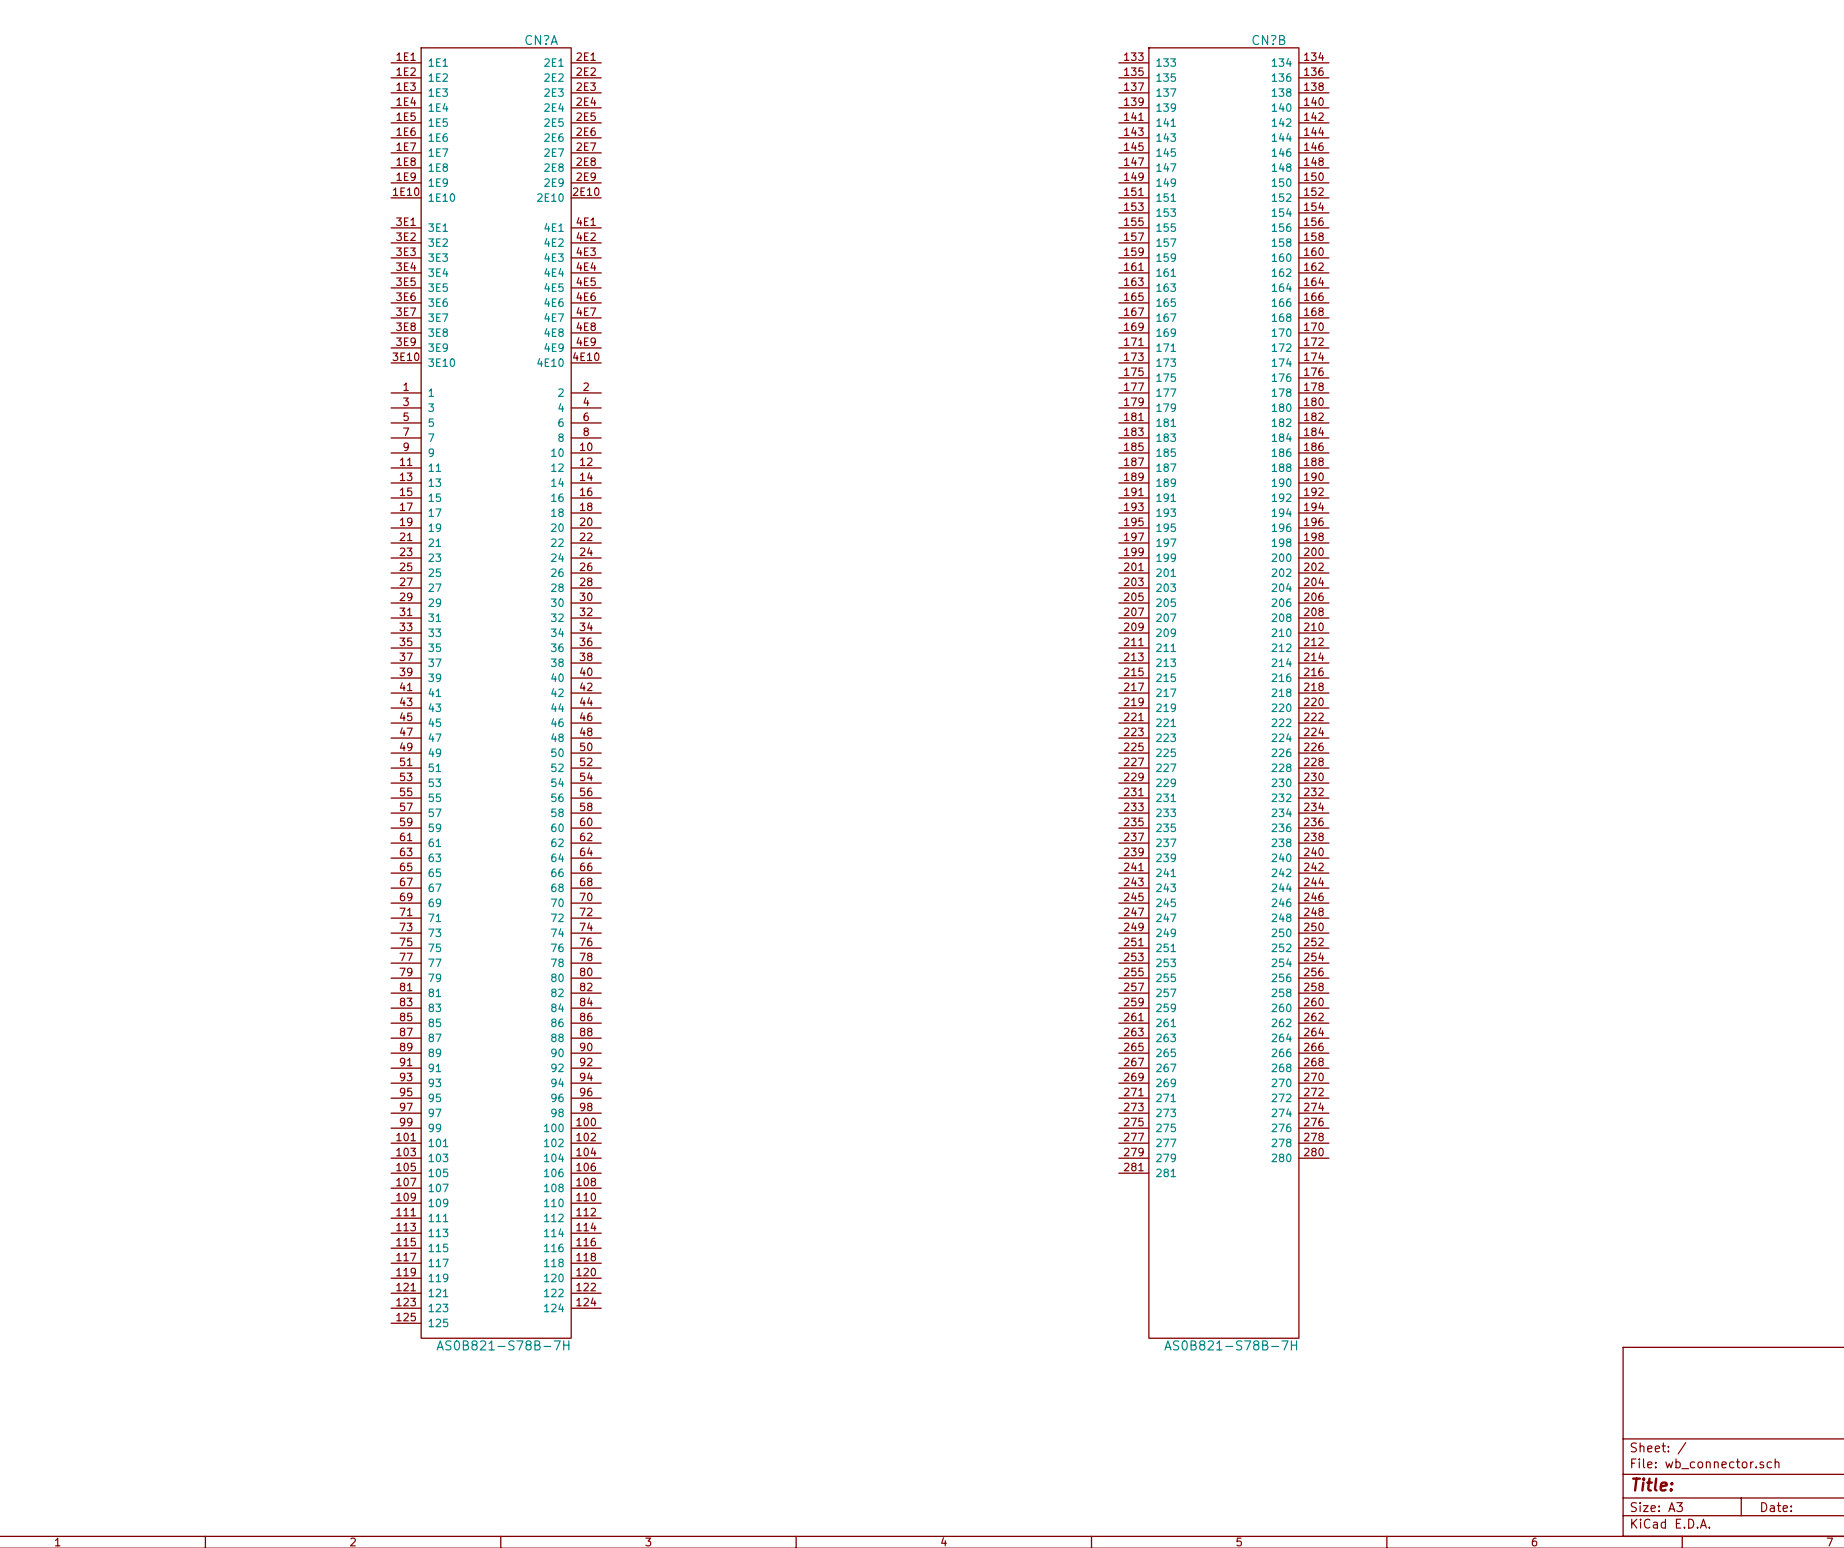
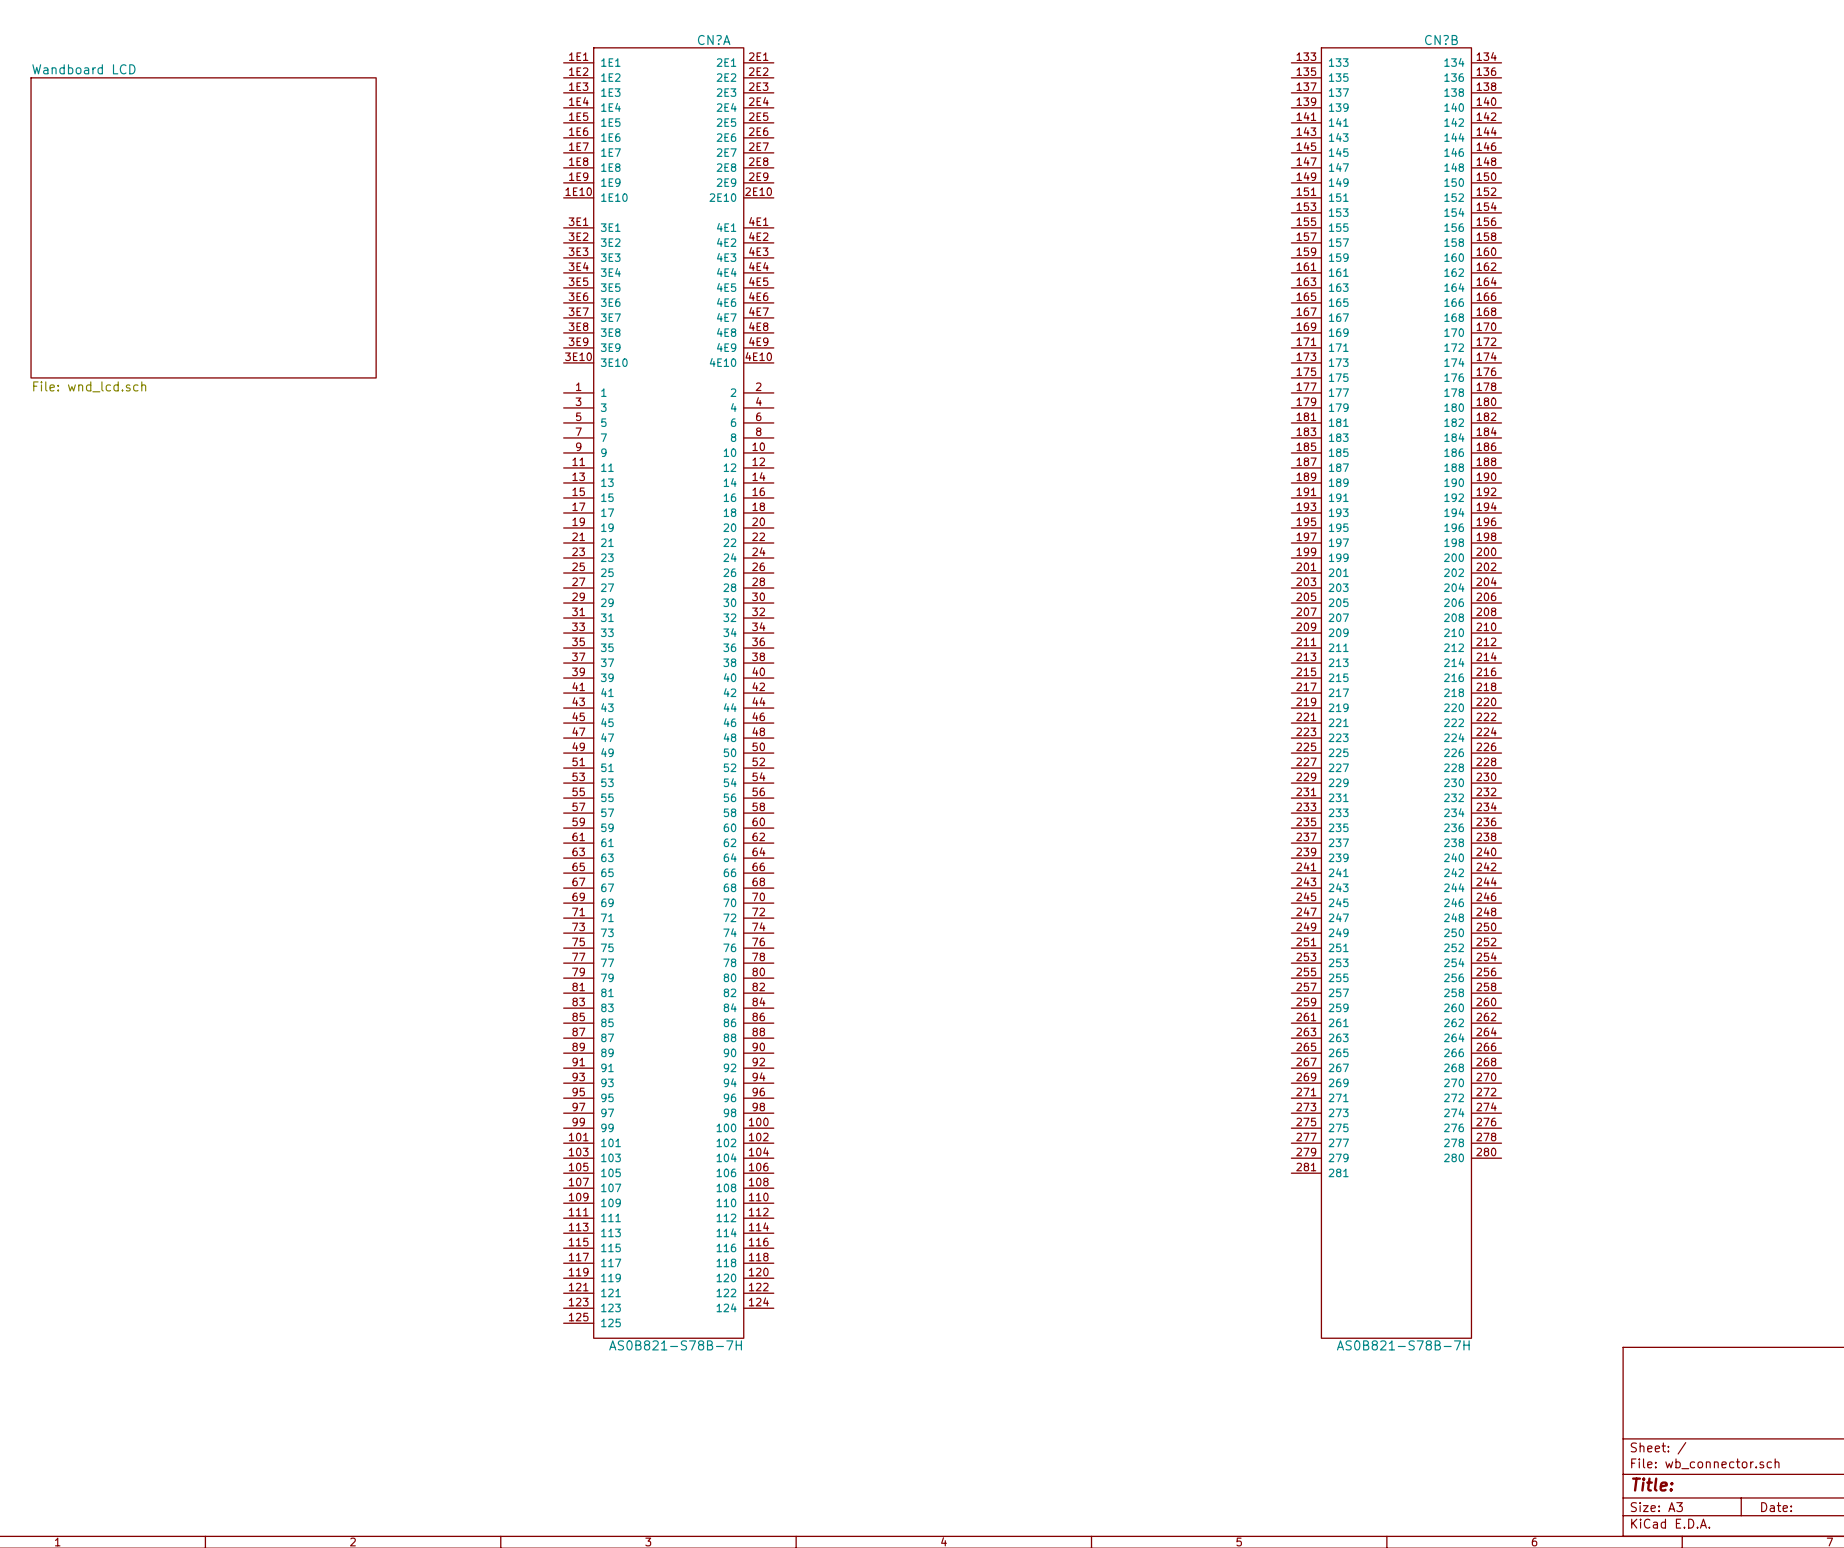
sheet Wandboard LCD: none -> File: wnd_lcd.sch (203, 227)
CN?A: AS0B821-S78B-7H (496, 693) -> none
CN?A: none -> AS0B821-S78B-7H (668, 693)
CN?B: AS0B821-S78B-7H (1223, 693) -> none
CN?B: none -> AS0B821-S78B-7H (1396, 693)

